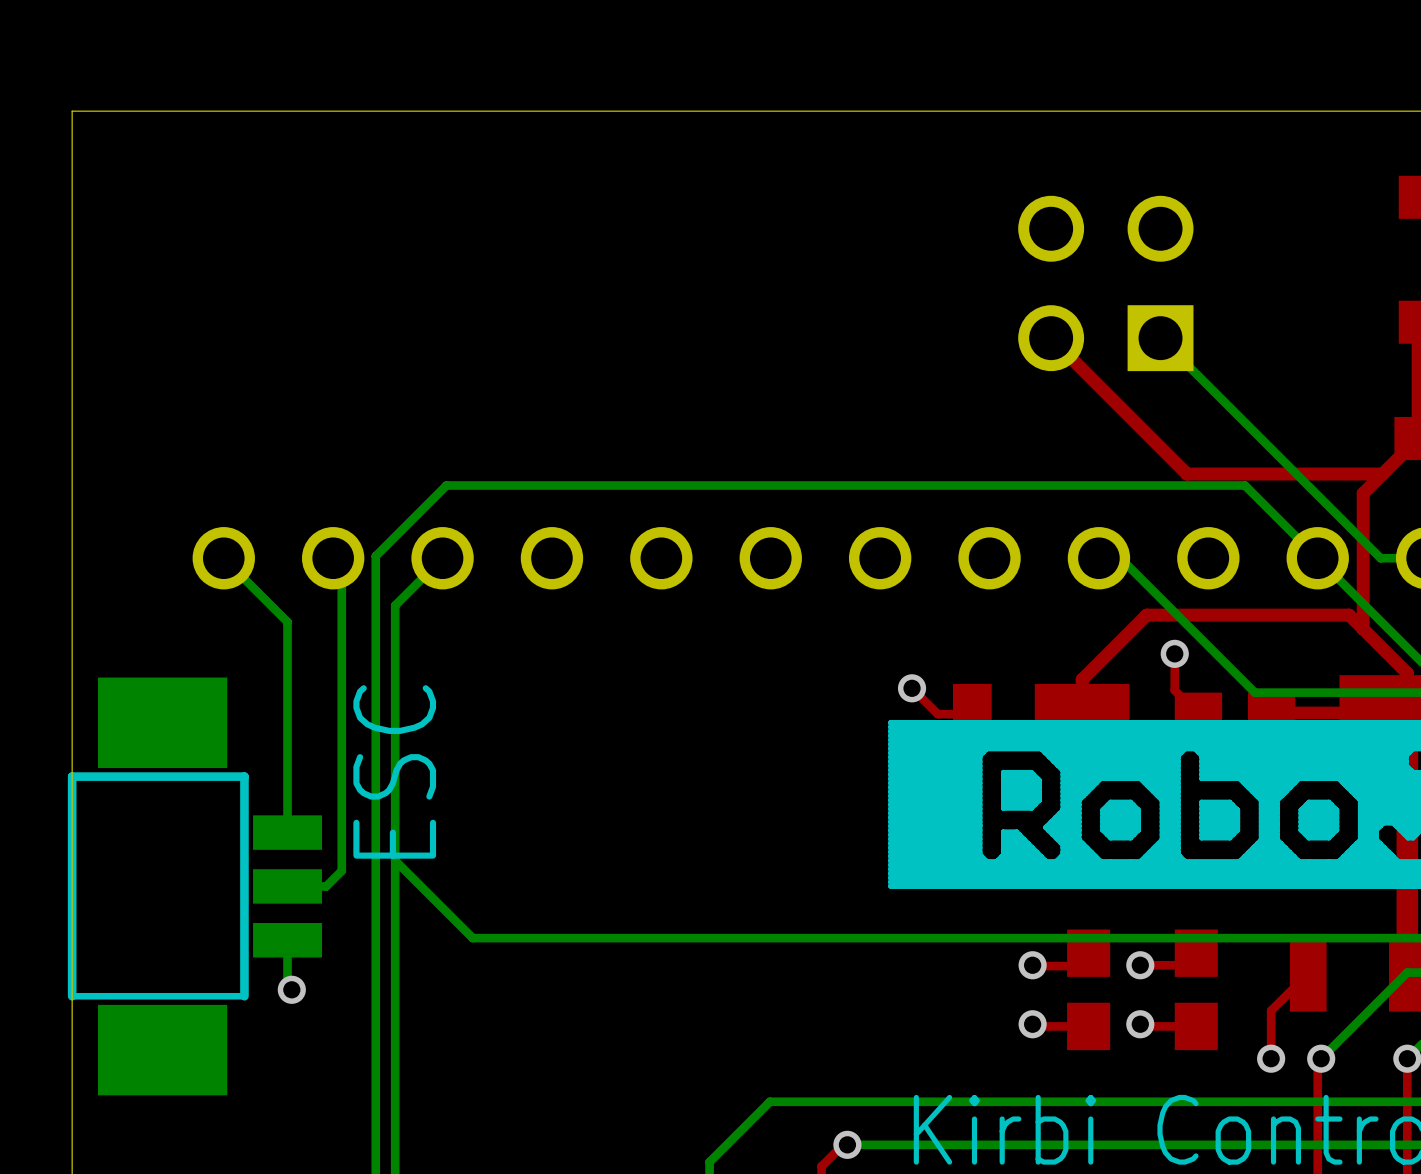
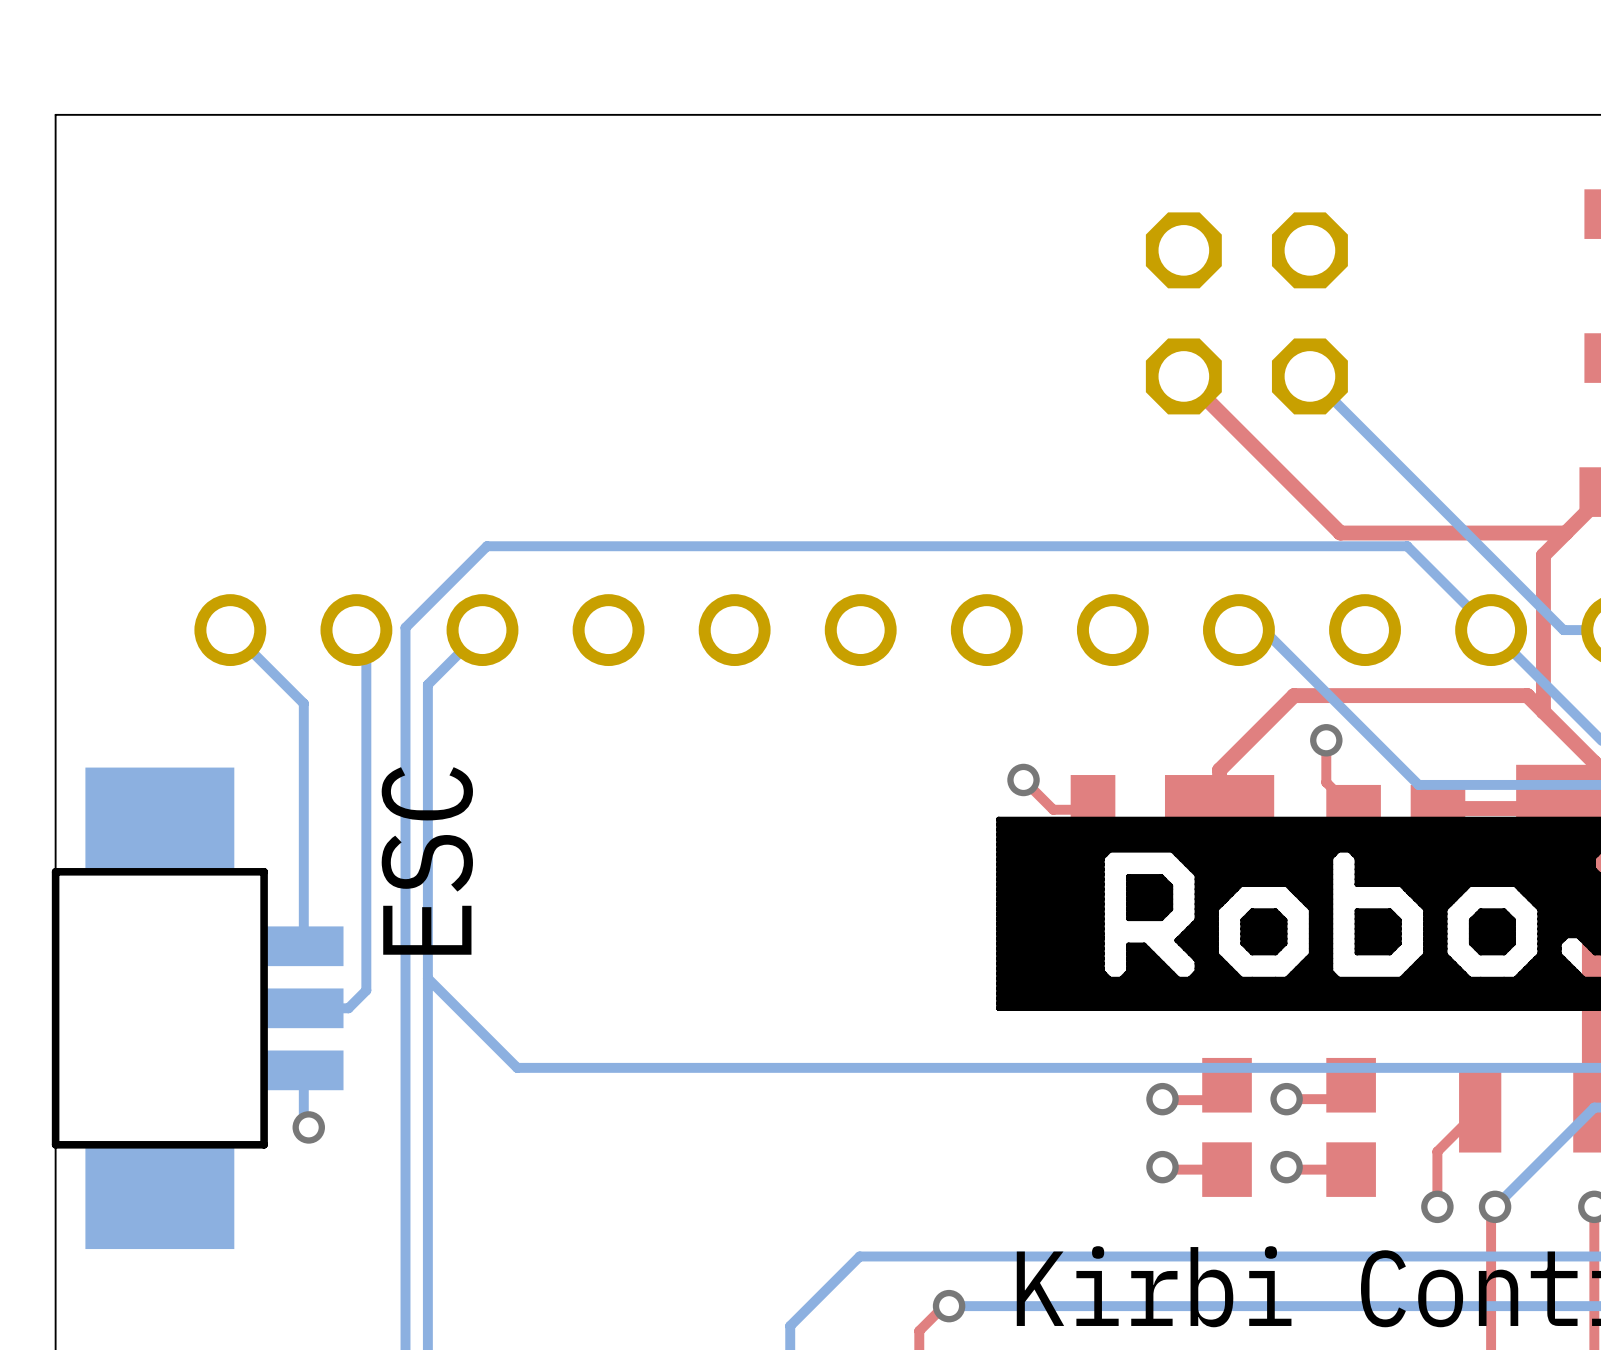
part footprint: [1018, 195, 1194, 372] -> [1145, 212, 1348, 415]
ESC footprint: [67, 677, 322, 1096] -> [51, 767, 344, 1250]

